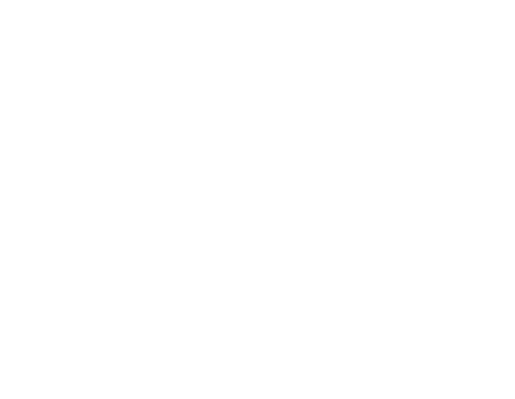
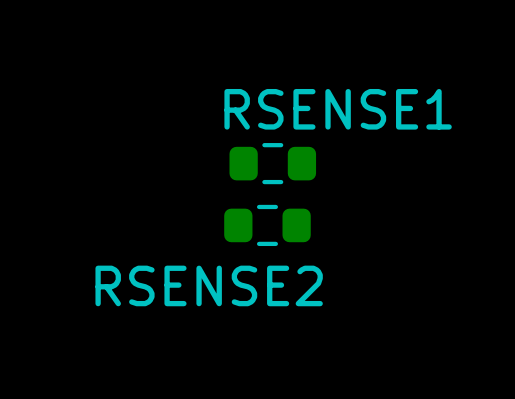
RSENSE1: none -> (272, 163)
RSENSE2: none -> (267, 225)

